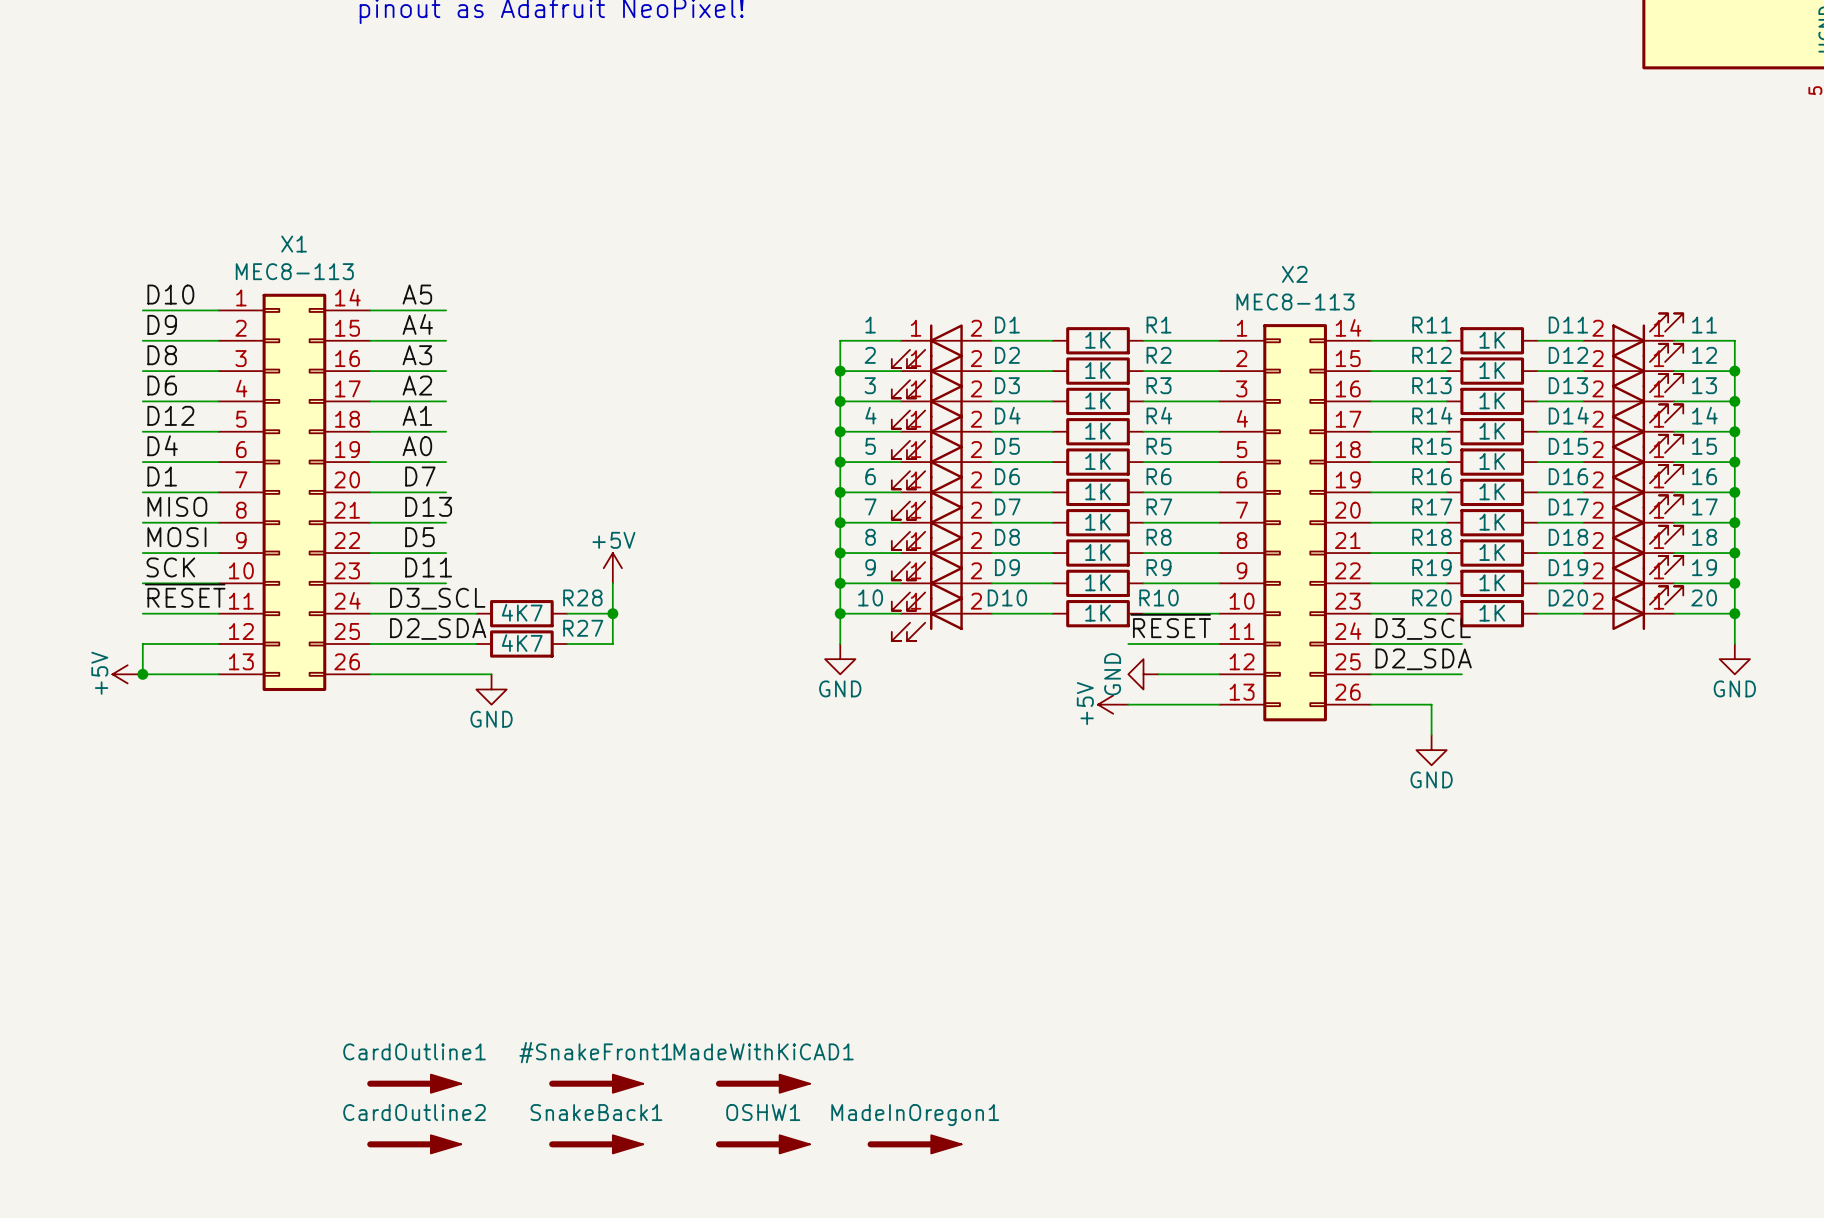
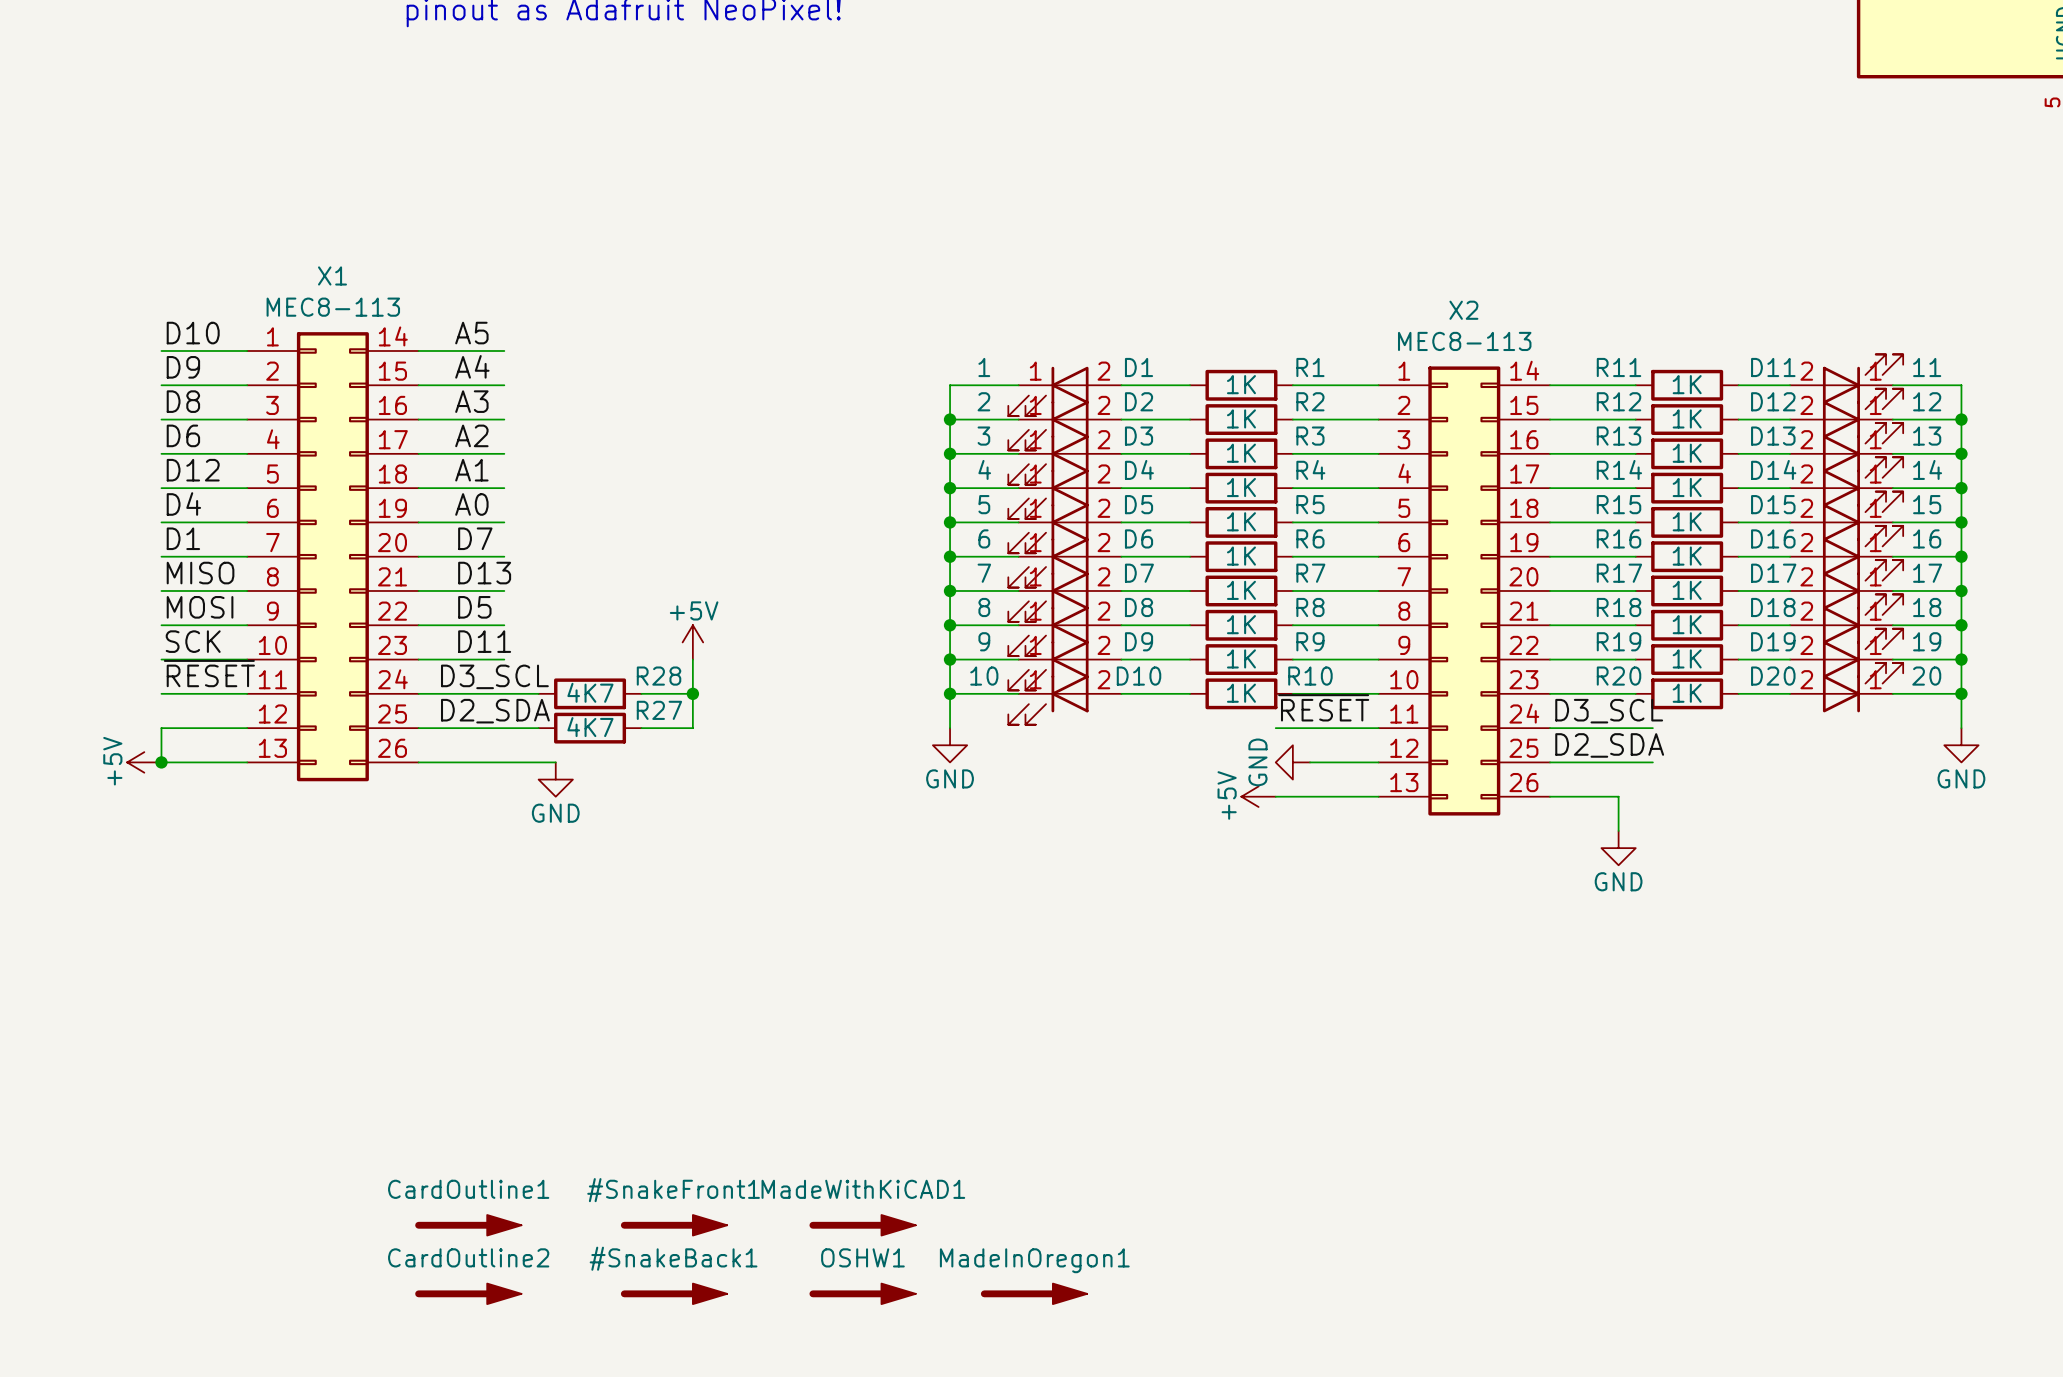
SnakeBack1: (596, 1144) -> none
#SnakeBack1: none -> (674, 1293)

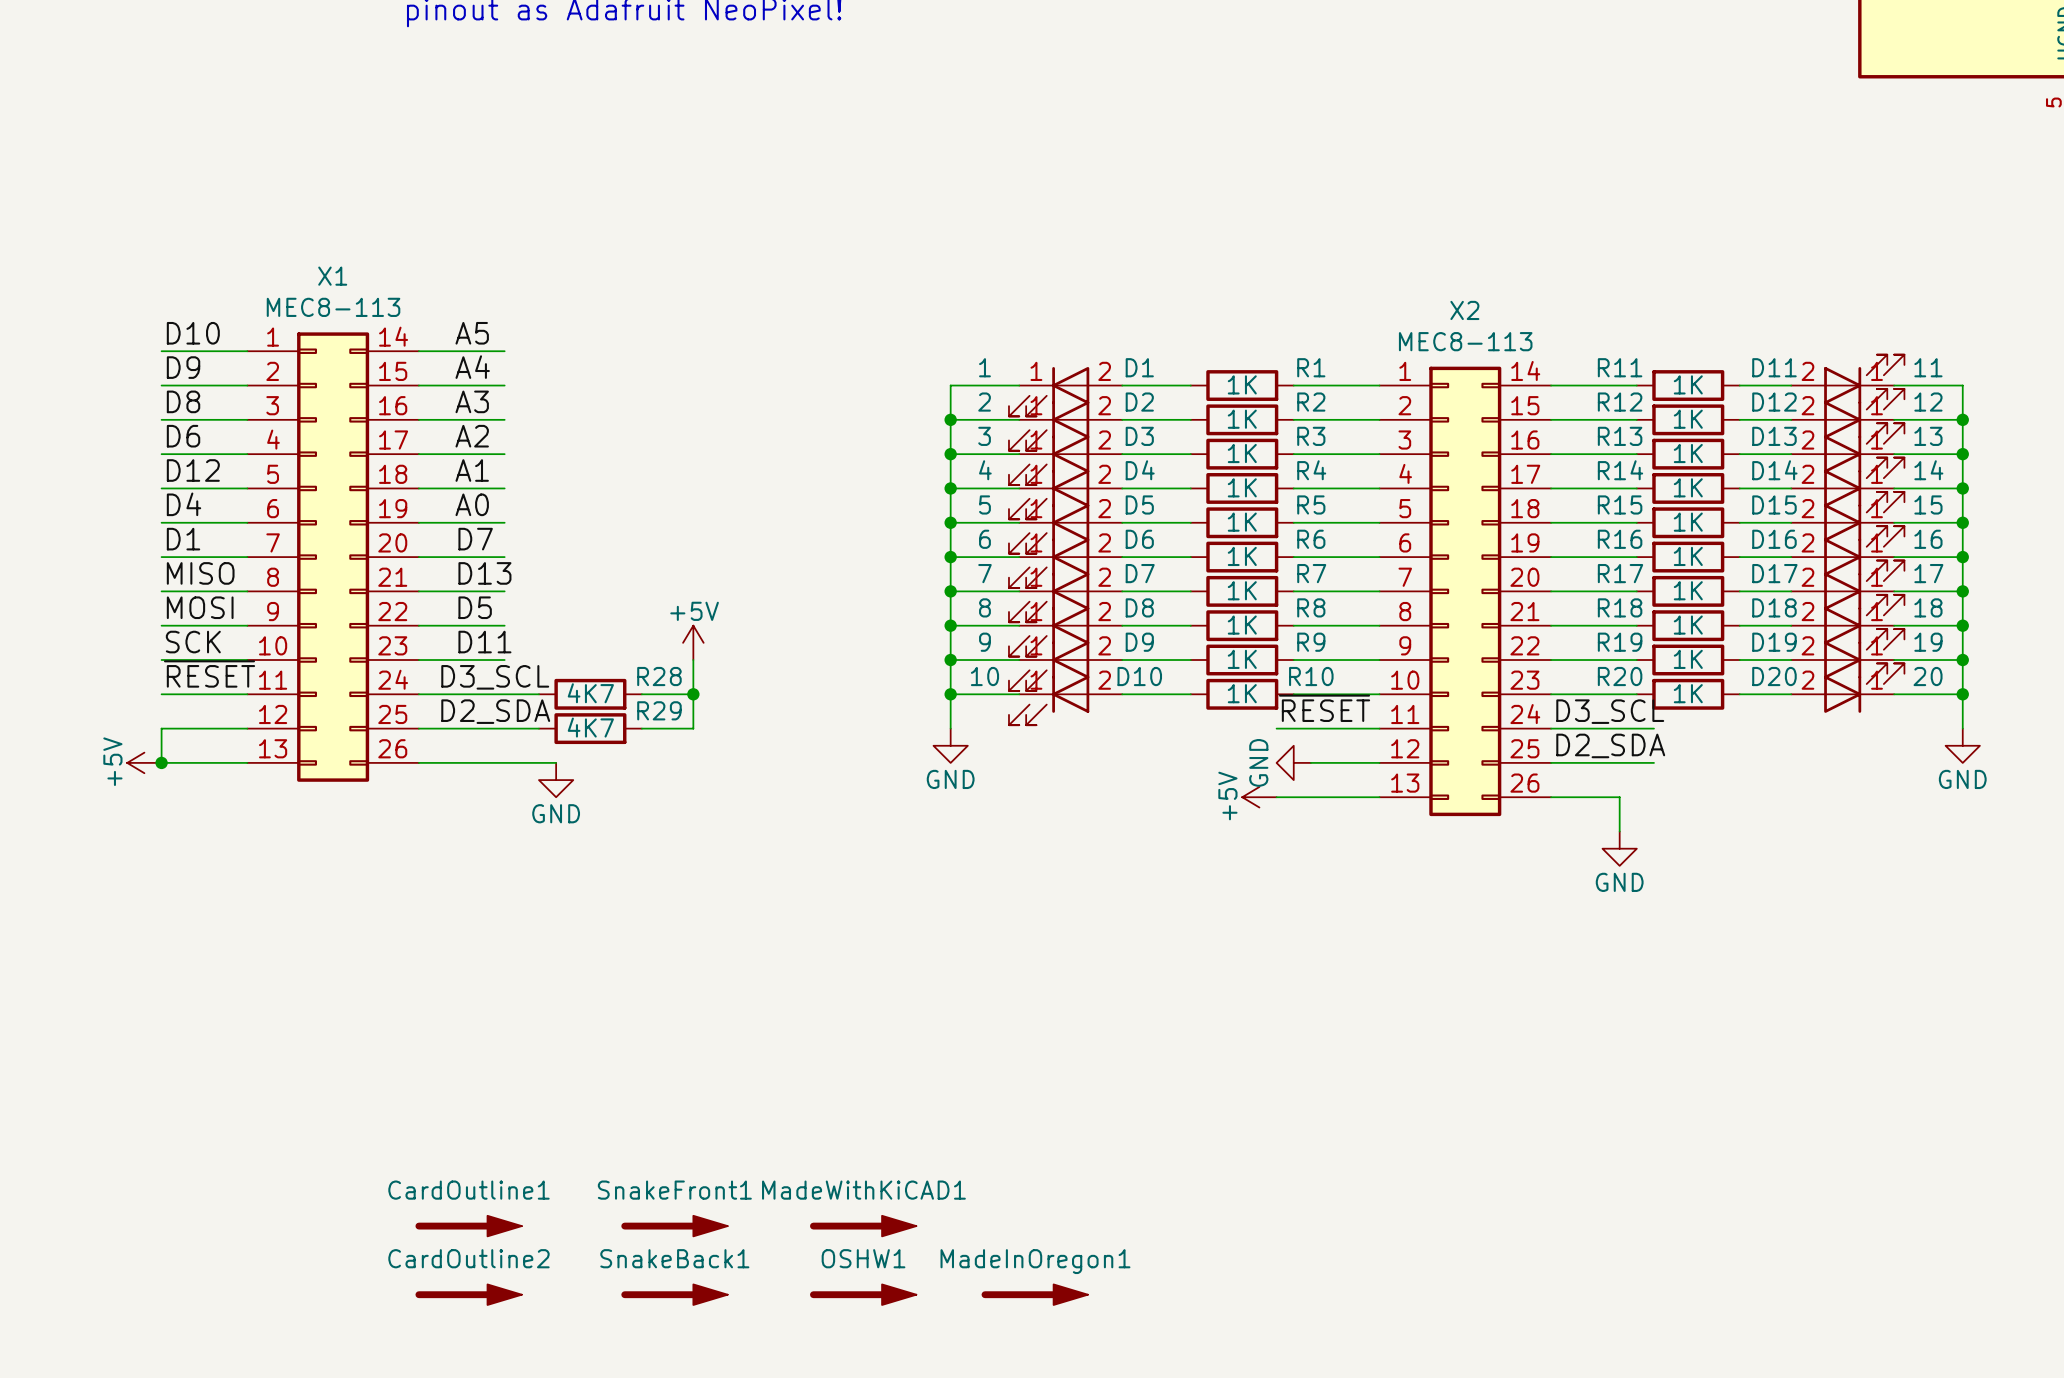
R27 name: R27 (659, 710) -> R29 (659, 710)
#SnakeFront1: (674, 1225) -> none
SnakeFront1: none -> (674, 1226)
#SnakeBack1: (674, 1293) -> none
SnakeBack1: none -> (674, 1294)

